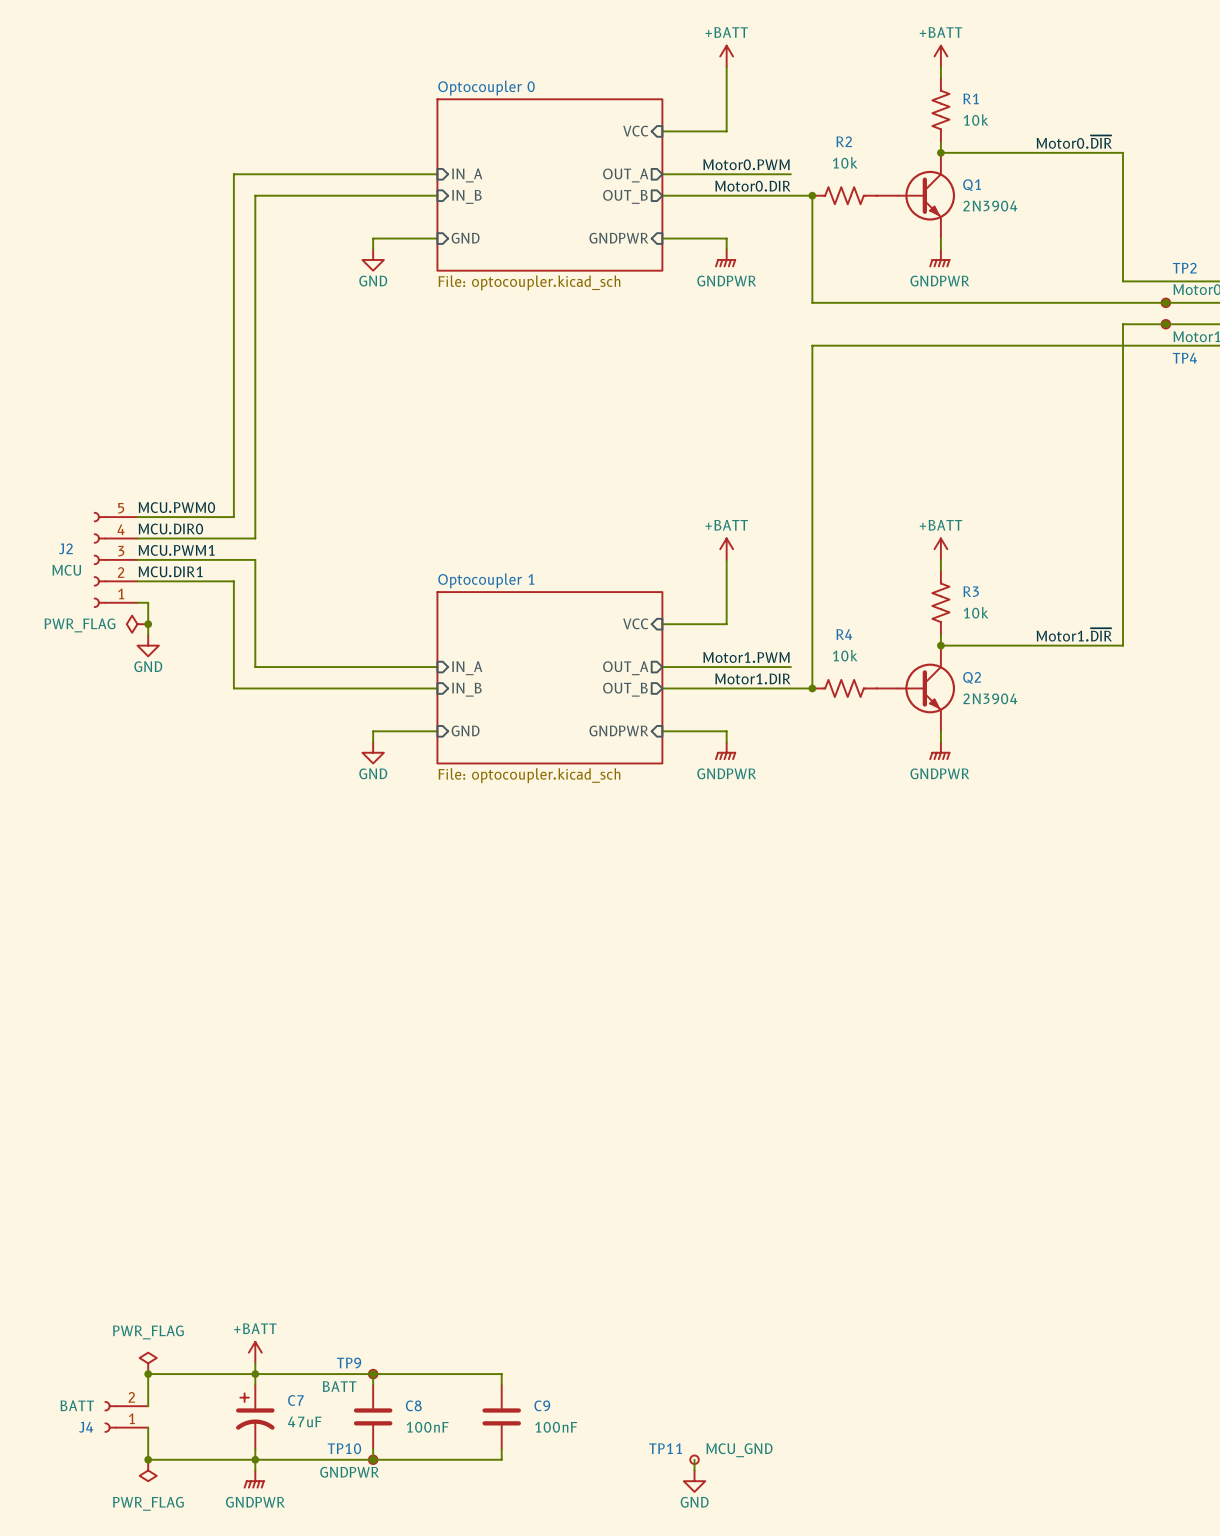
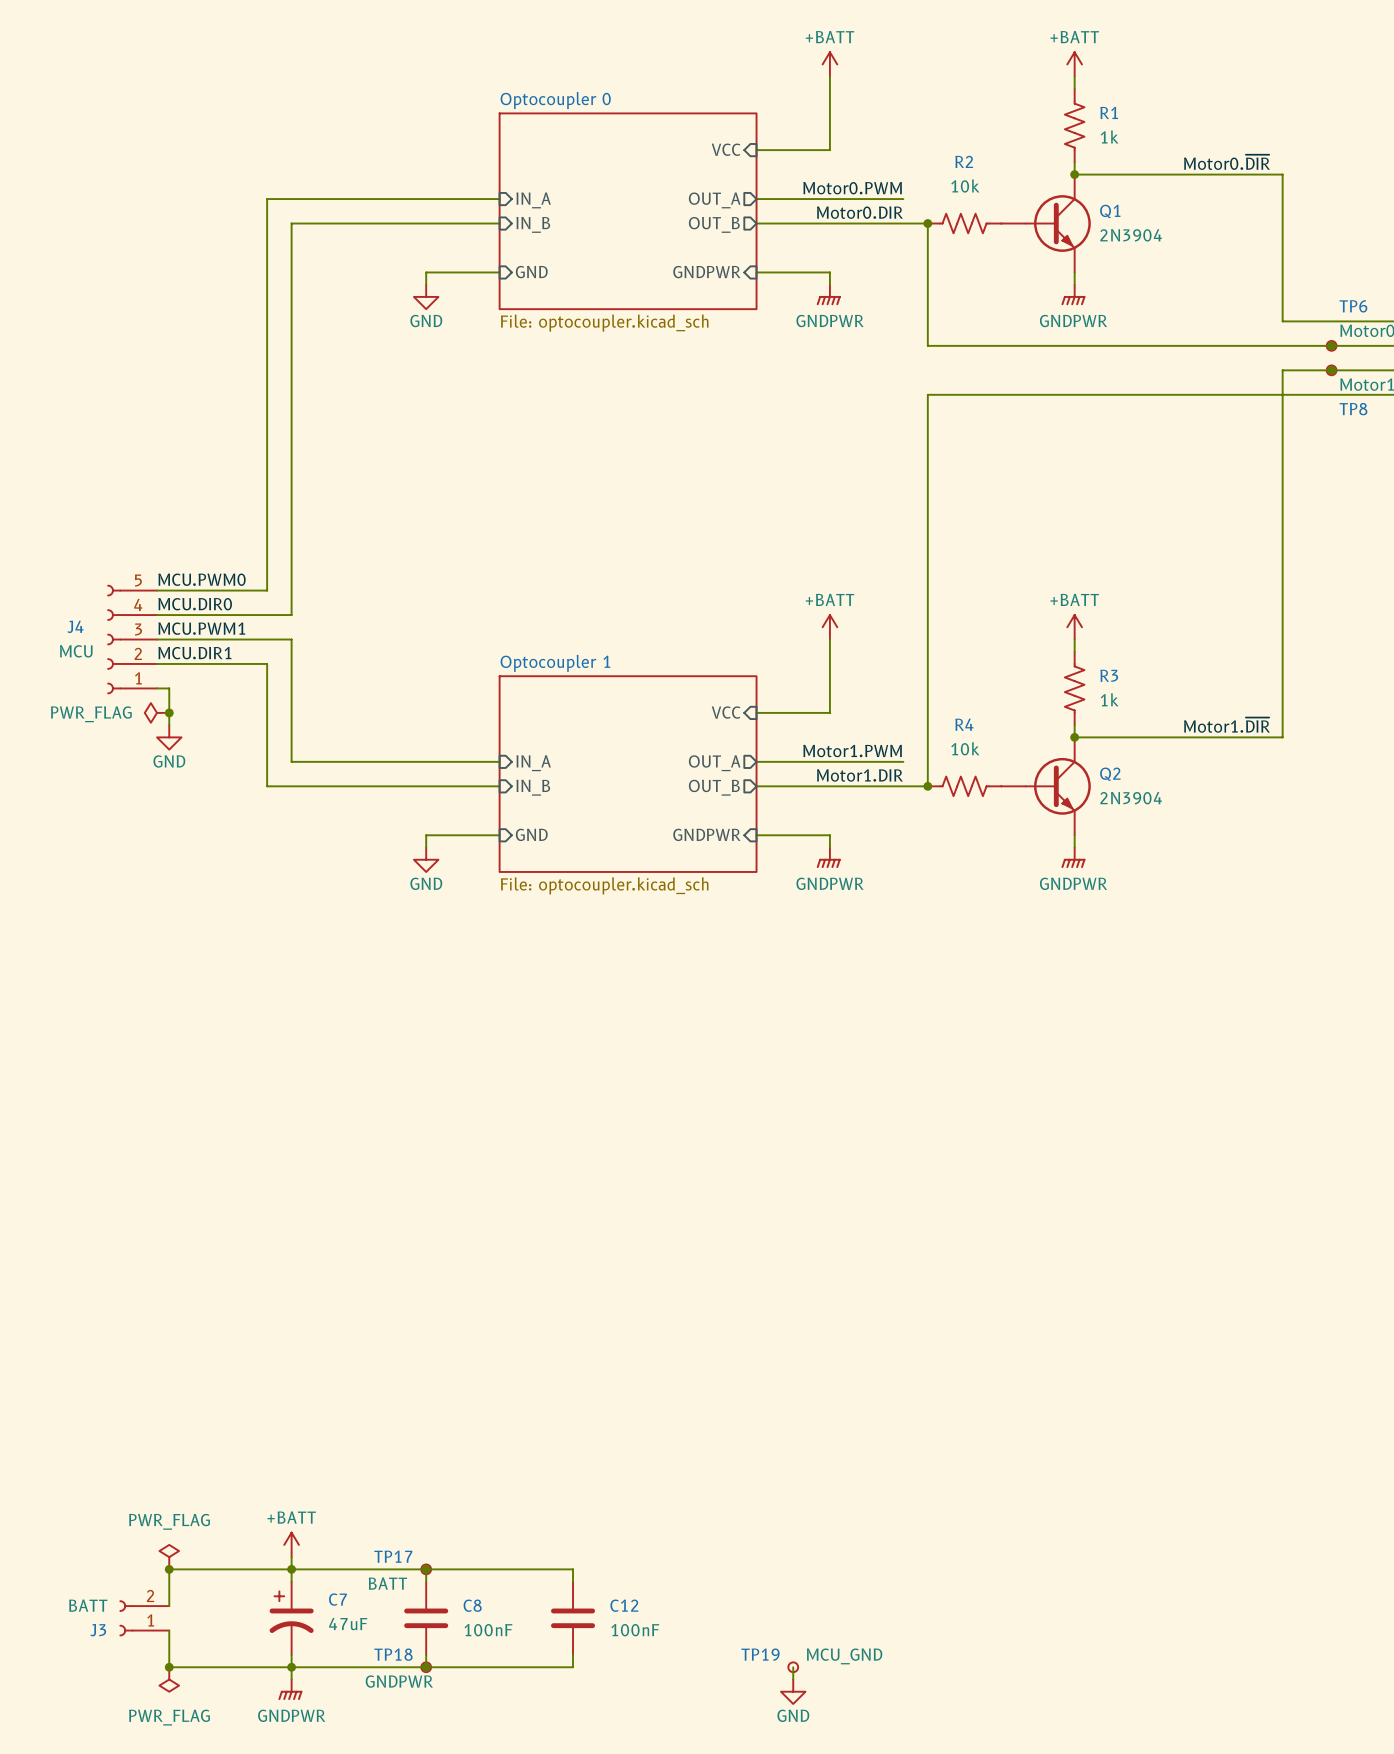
R1 value: 10k (976, 120) -> 1k (1109, 137)
TP2 name: TP2 (1184, 268) -> TP6 (1353, 306)
TP4 name: TP4 (1184, 358) -> TP8 (1353, 409)
J2 name: J2 (65, 548) -> J4 (75, 626)
R3 value: 10k (976, 612) -> 1k (1109, 699)
TP9 name: TP9 (349, 1363) -> TP17 (393, 1556)
C9 name: C9 (542, 1405) -> C12 (624, 1605)
J4 name: J4 (86, 1427) -> J3 (98, 1630)
TP10 name: TP10 (344, 1448) -> TP18 (393, 1654)
TP11 name: TP11 (665, 1448) -> TP19 (760, 1654)

